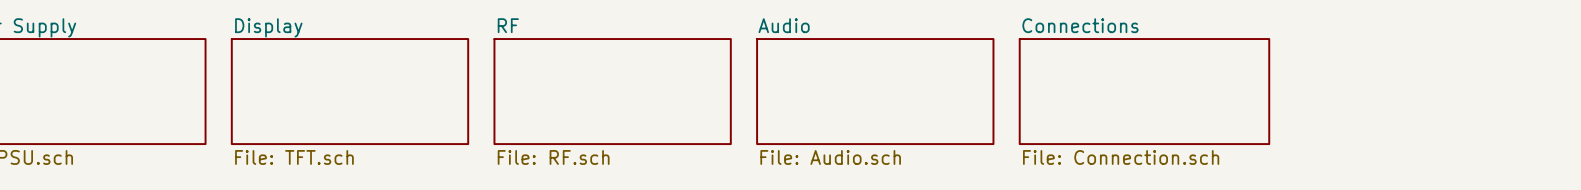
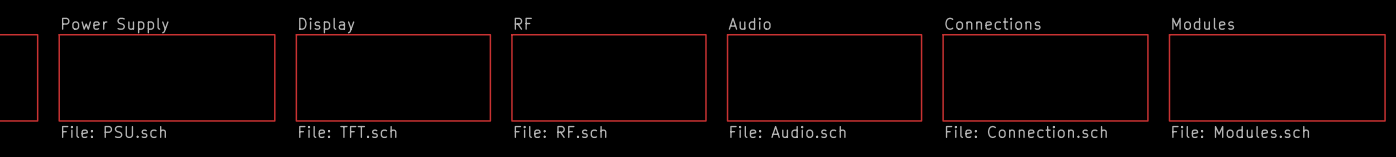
sheet Modules: none -> File: Modules.sch (1277, 77)

